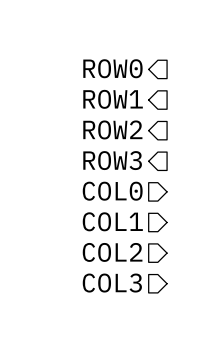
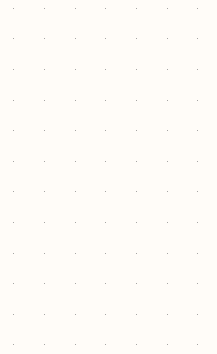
hierarchical label: ROW0 (112, 68) -> none
hierarchical label: ROW1 (113, 99) -> none
hierarchical label: ROW2 (112, 129) -> none
hierarchical label: ROW3 (112, 160) -> none
hierarchical label: COL0 (112, 191) -> none
hierarchical label: COL1 (112, 221) -> none
hierarchical label: COL2 (112, 252) -> none
hierarchical label: COL3 (112, 283) -> none

